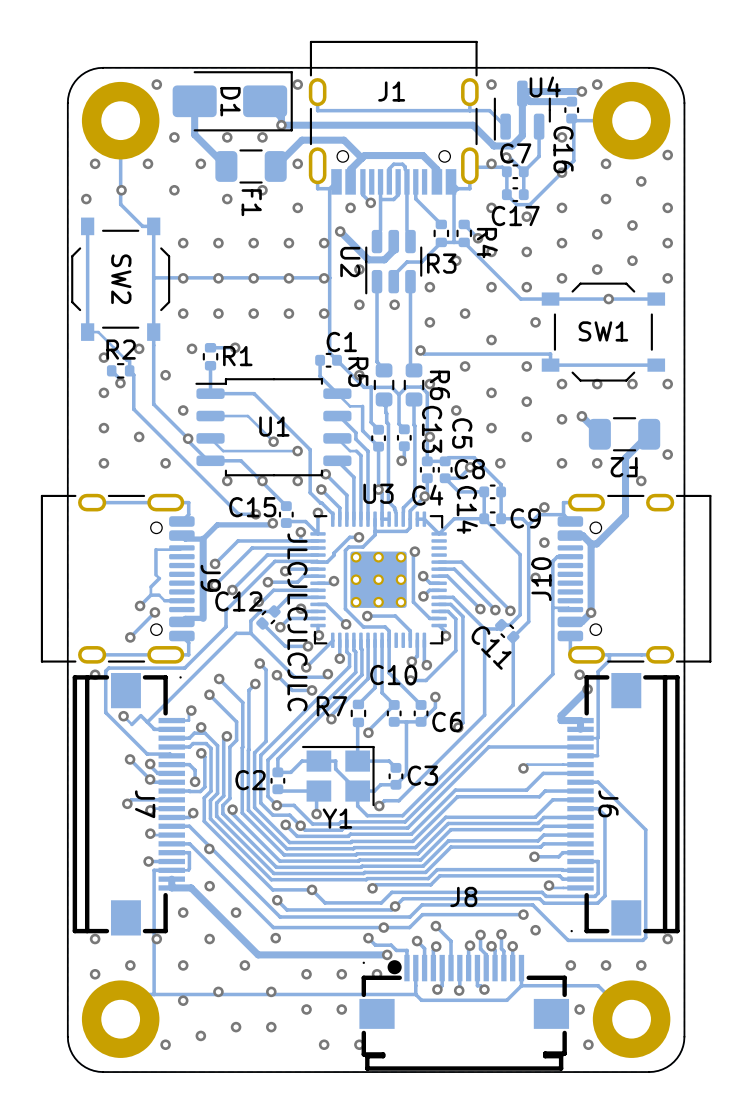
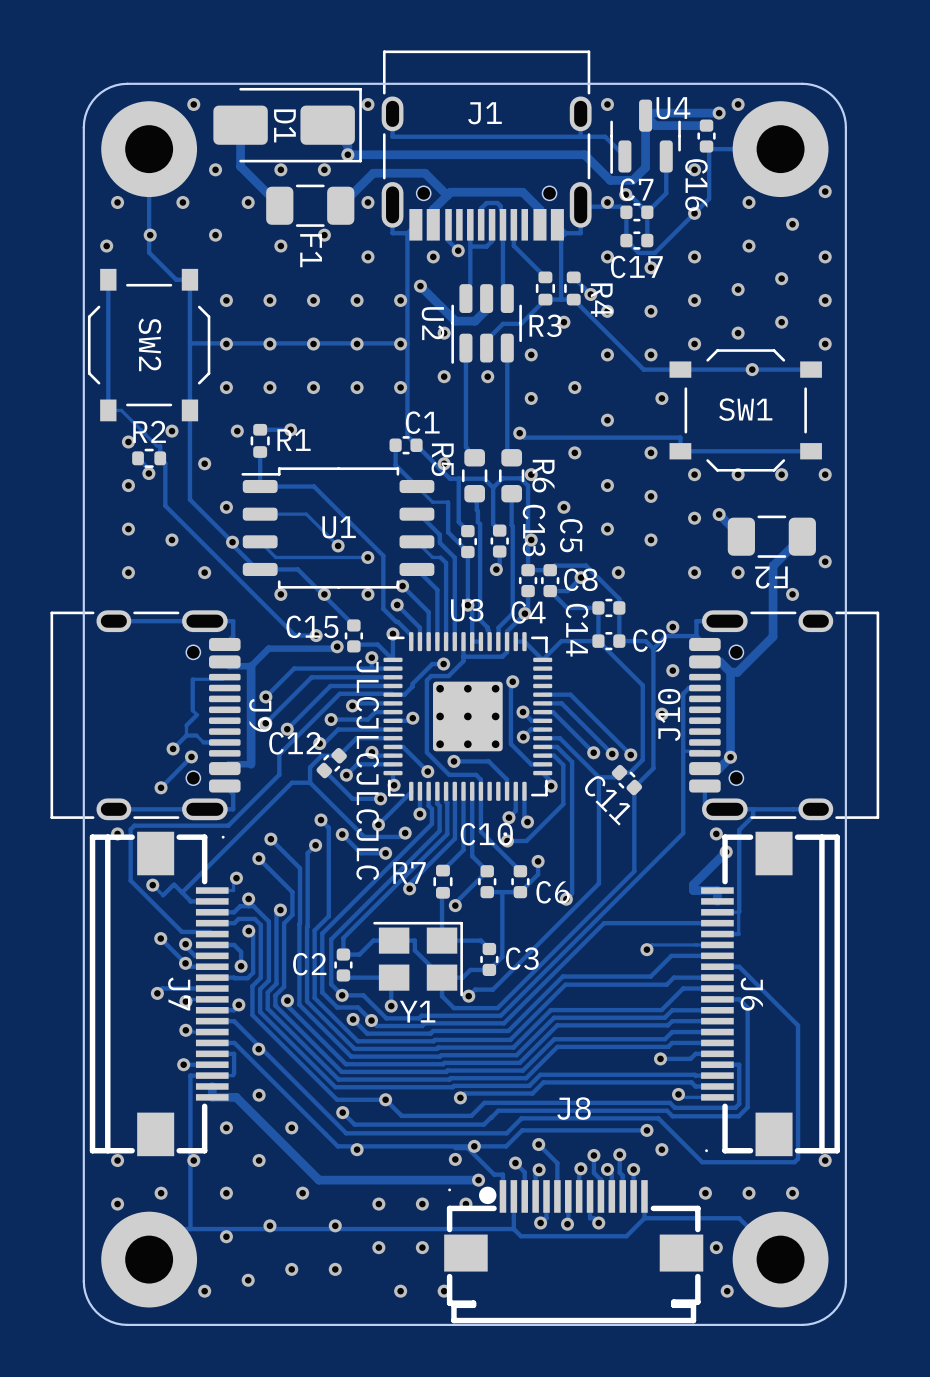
via: (395, 906) -> none
via position: (275, 938) -> (357, 1149)
track: (368, 938) (375, 945) (391, 945) (396, 950) (399, 950) -> (455, 1148) (467, 1148) (494, 1174)

